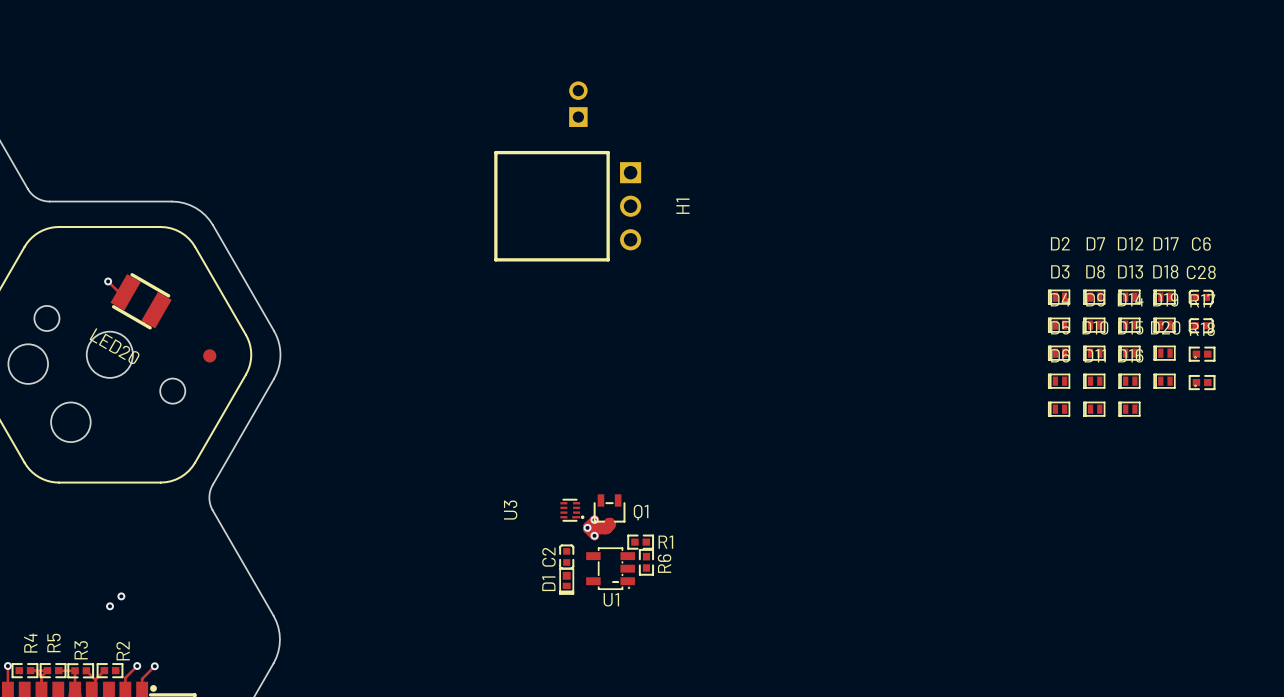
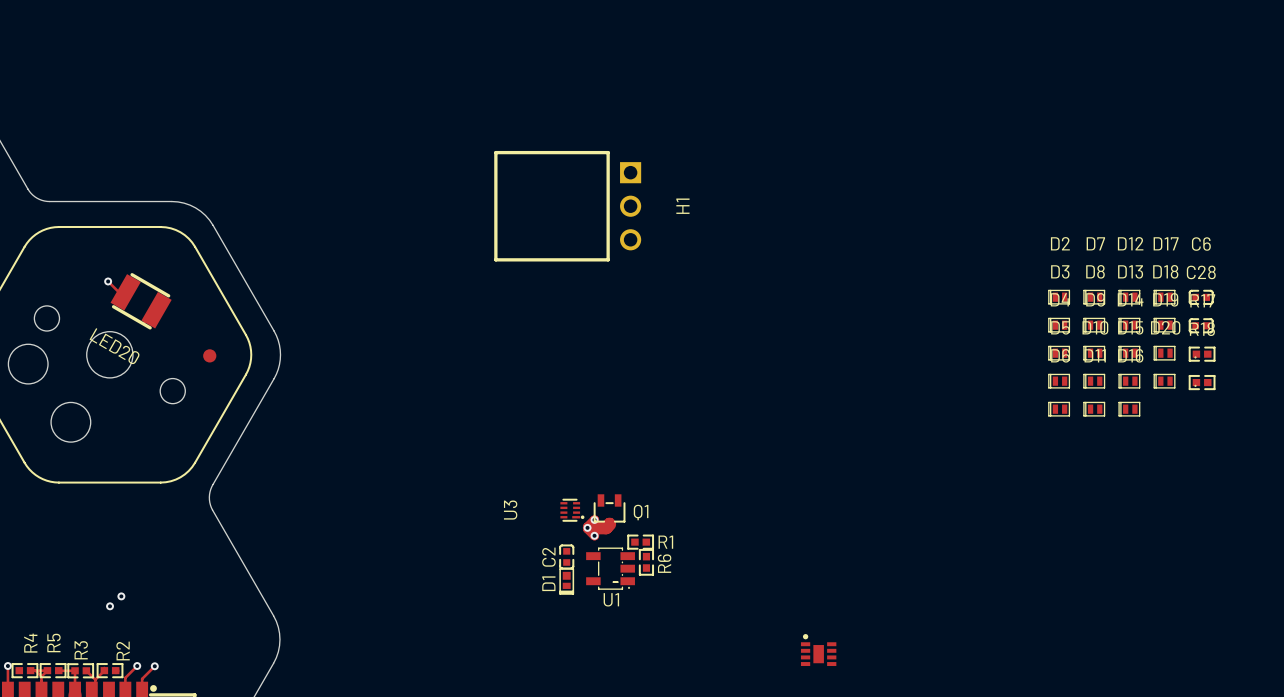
part: (578, 104) -> none
part: none -> (818, 650)

